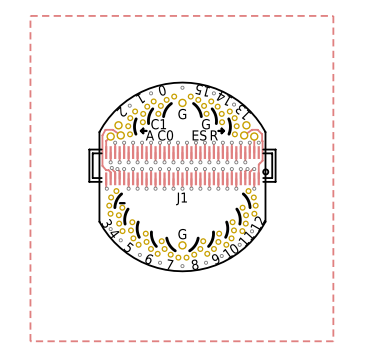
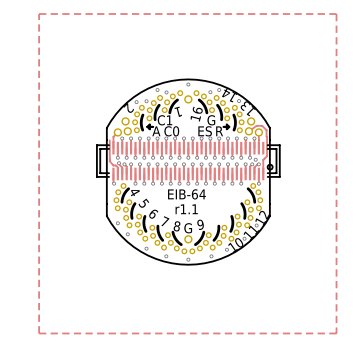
text: 0 (162, 90) -> none
text: 15 (202, 90) -> none
via: none -> (166, 92)
via: none -> (210, 92)
text rotation: 0° (140, 98) -> 15° clockwise (178, 111)
text position: 1 (140, 98) -> 1 (178, 111)
via: none -> (146, 101)
text: G (182, 114) -> 16 (196, 114)
track: (120, 135) (112, 129) (105, 129) (102, 135) (102, 144) -> none
via position: (258, 142) -> (255, 159)
J1 name: J1 (181, 198) -> none
text: none -> EIB-64 (186, 194)
line: (119, 203) (124, 203) -> none
text: none -> r1.1 (186, 209)
text: 3 (106, 223) -> none
text rotation: 0° (114, 234) -> 8° clockwise (135, 193)
text position: 4 (114, 234) -> 4 (135, 193)
text rotation: 0° (128, 247) -> 13° clockwise (143, 203)
text position: 5 (128, 247) -> 5 (143, 203)
text rotation: 0° (149, 259) -> 15° clockwise (153, 214)
text position: 6 (149, 259) -> 6 (153, 214)
text rotation: 0° (215, 259) -> 14° clockwise (200, 224)
text position: 9 (215, 259) -> 9 (200, 224)
text rotation: 0° (170, 264) -> 14° clockwise (165, 221)
text position: 7 (170, 264) -> 7 (165, 221)
text rotation: 0° (195, 264) -> 20° clockwise (177, 226)
text position: 8 (195, 264) -> 8 (177, 226)

